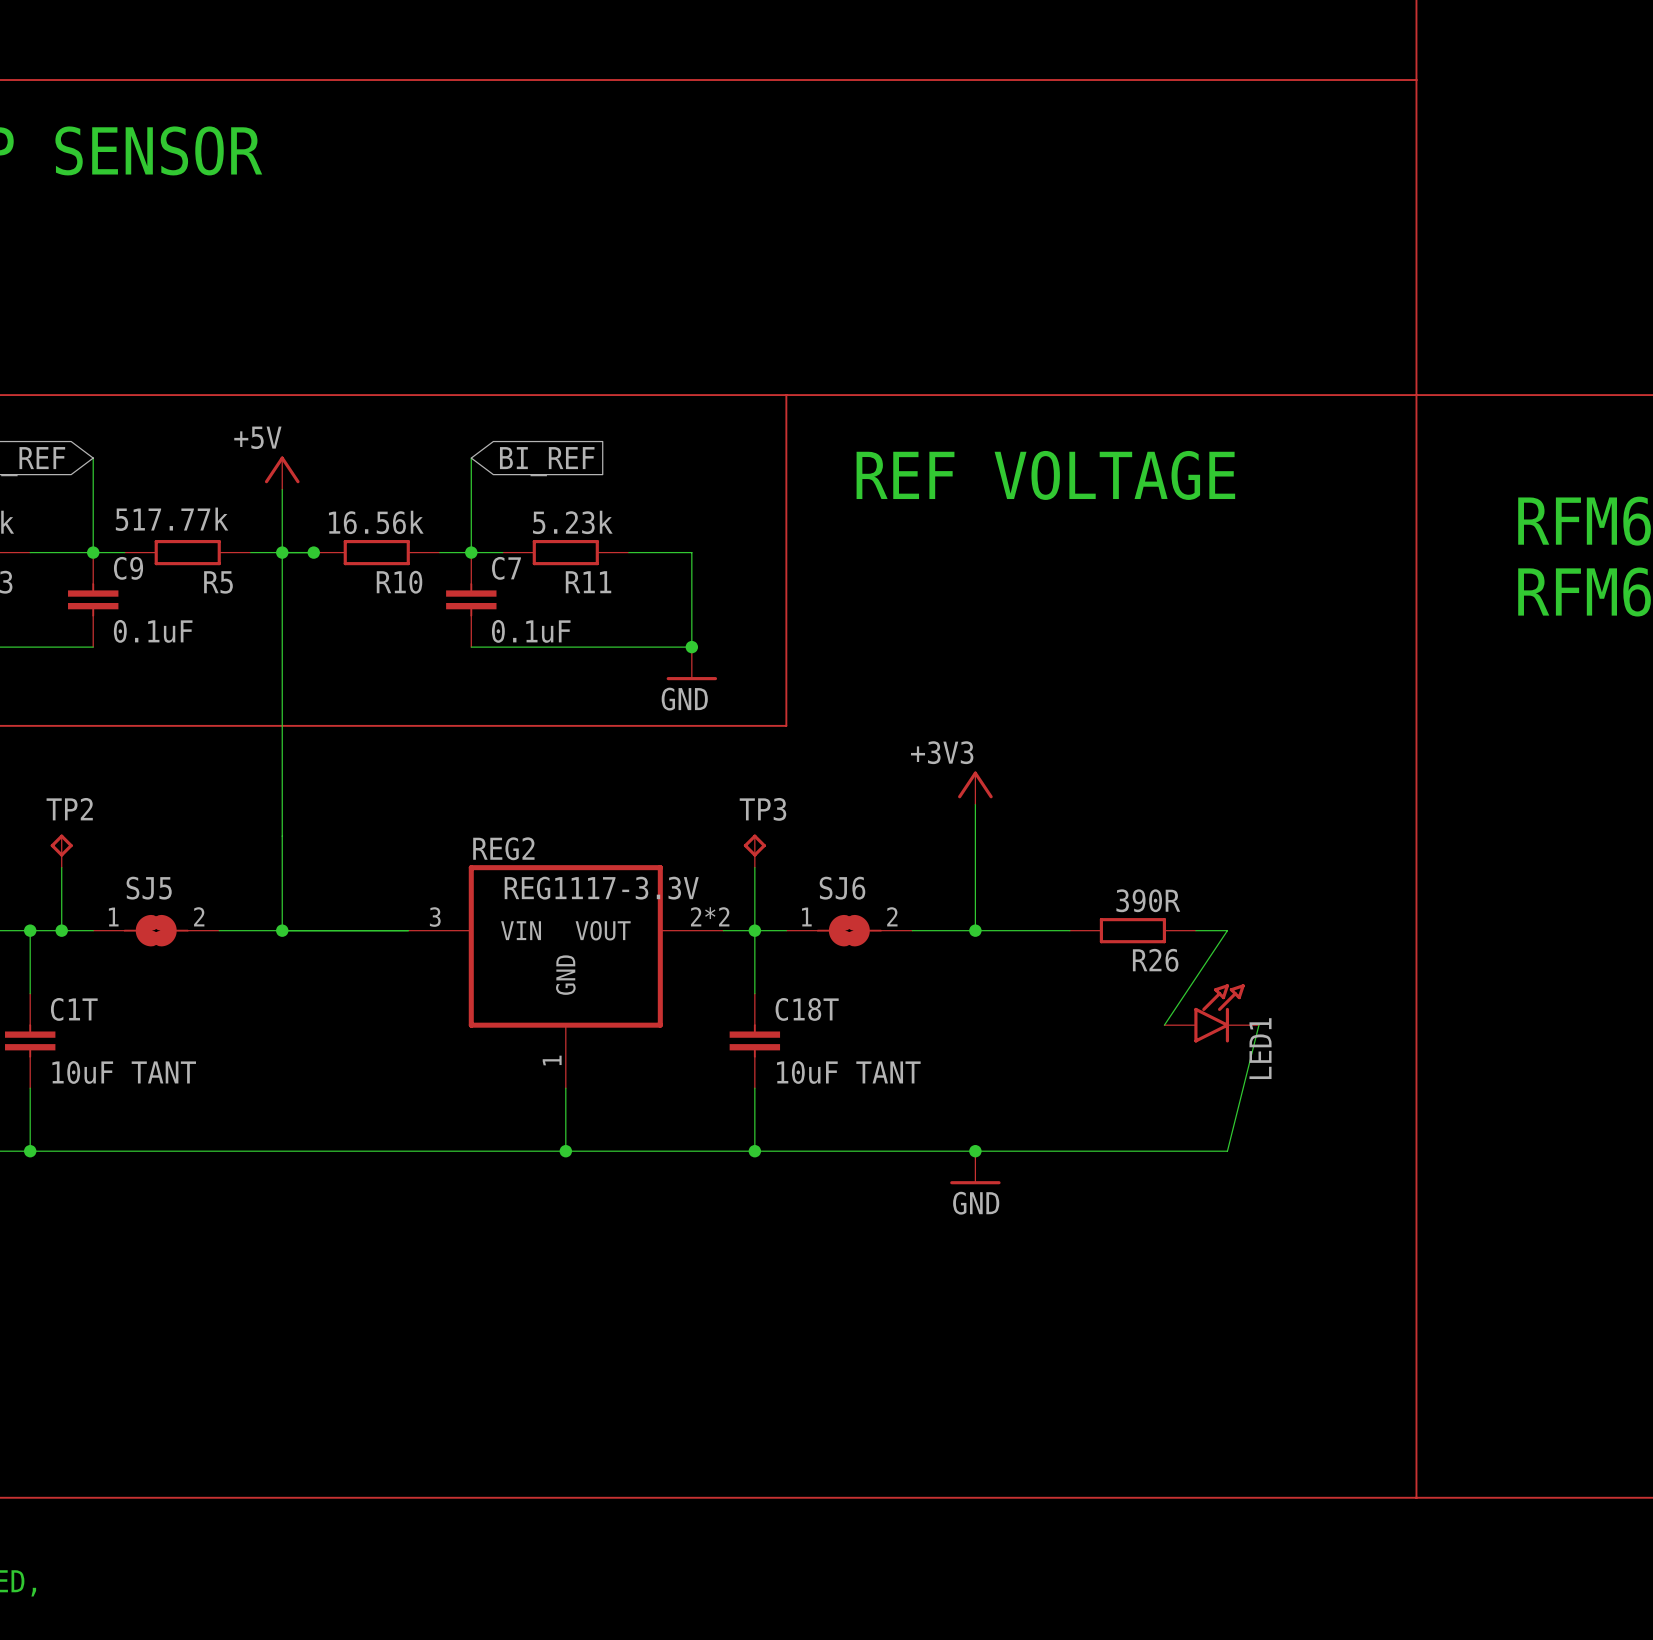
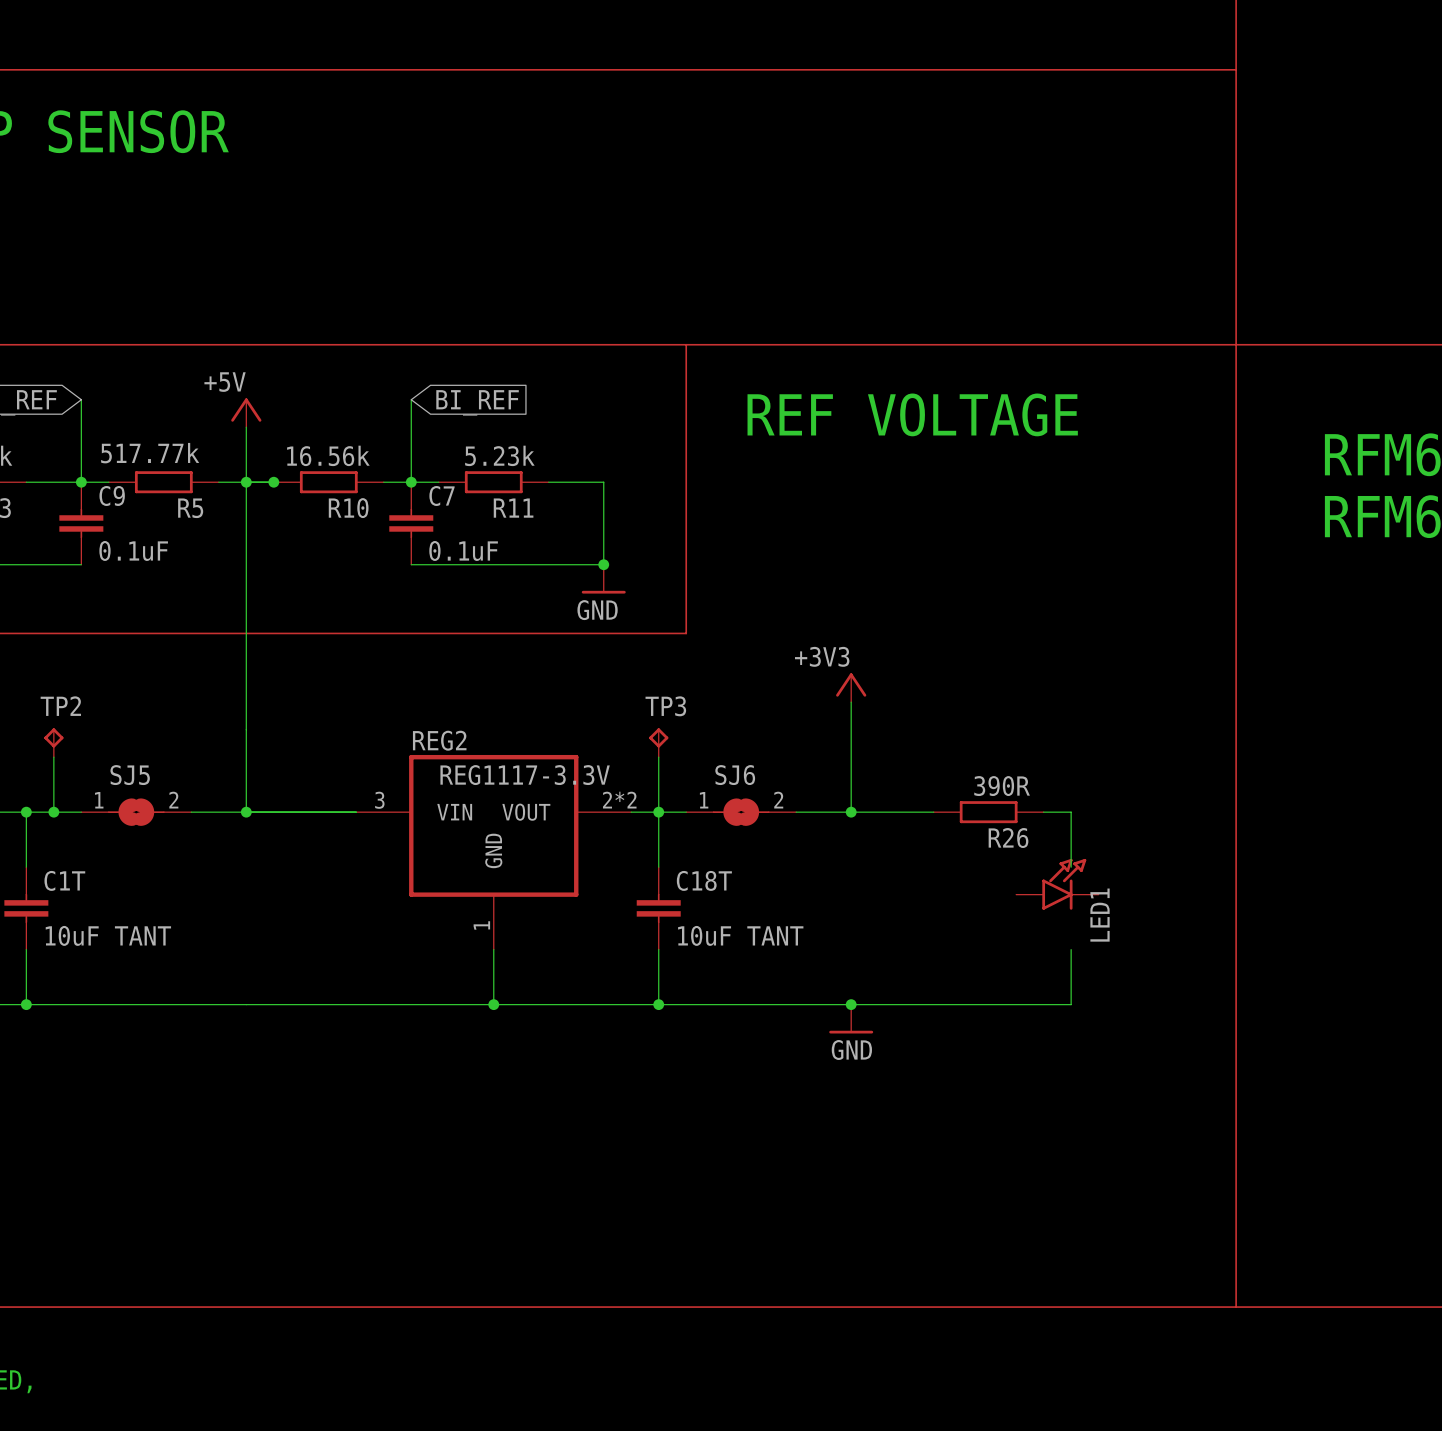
wire: (1227, 930) (1164, 1025) -> (1071, 812) (1071, 867)
wire: (1258, 1025) (1227, 1151) -> (1071, 949) (1071, 1004)

